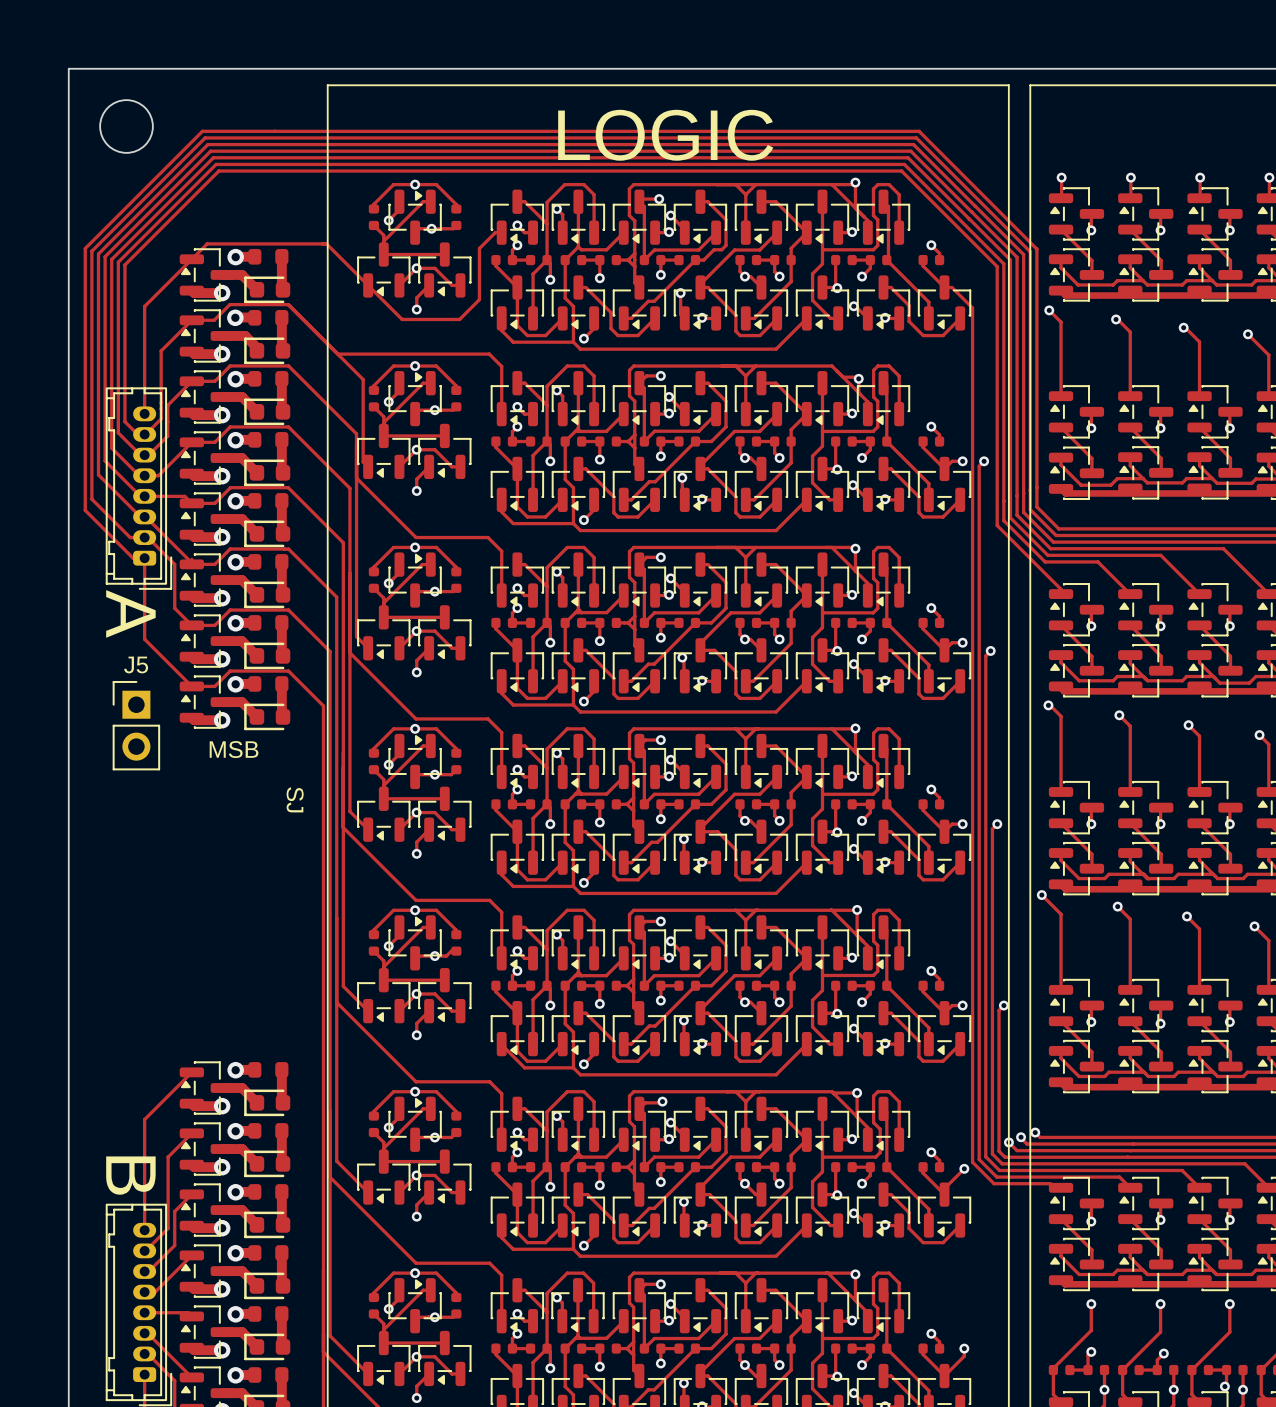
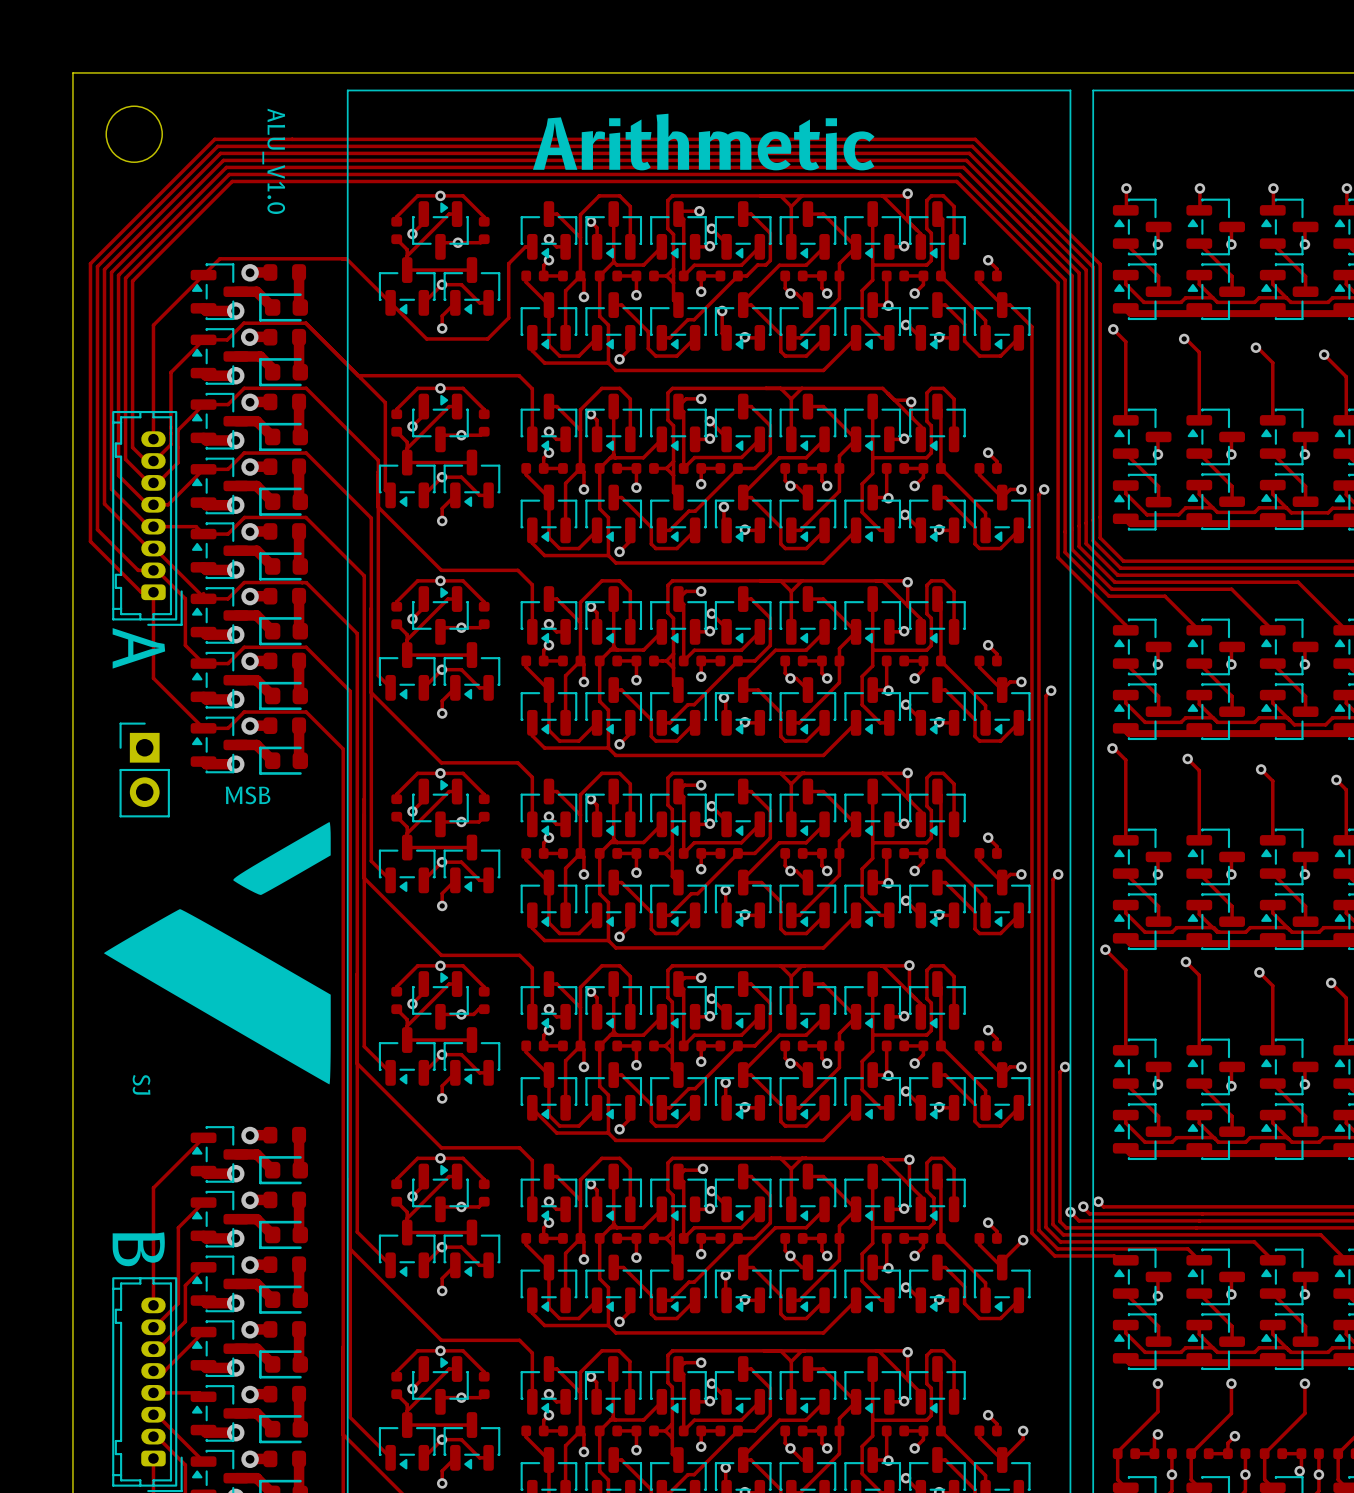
text: LOGIC (665, 135) -> Arithmetic (703, 142)
text: none -> ALU_V1.0 (273, 161)
J5 name: J5 (136, 664) -> none
drawing: none -> [103, 821, 331, 1085]
text position: SJ (295, 799) -> SJ (141, 1084)

